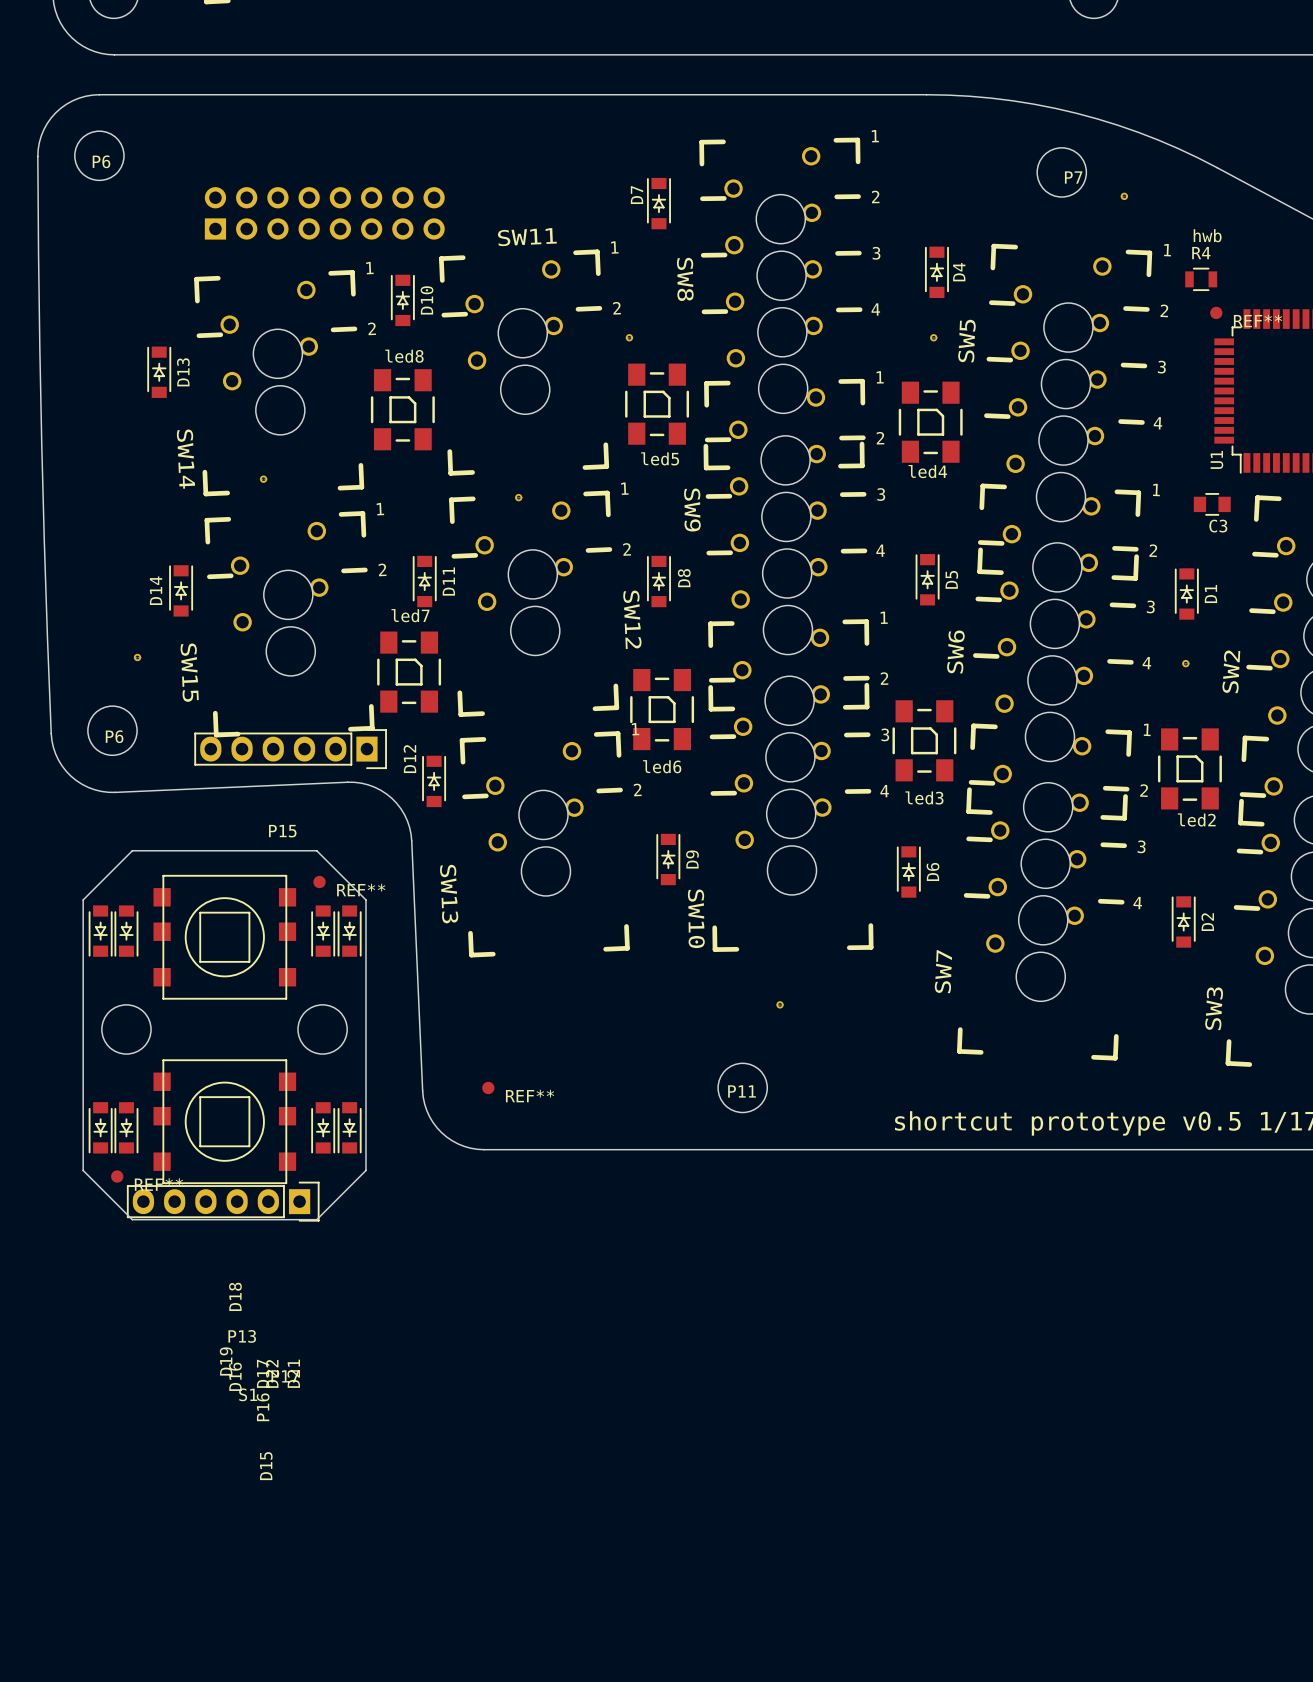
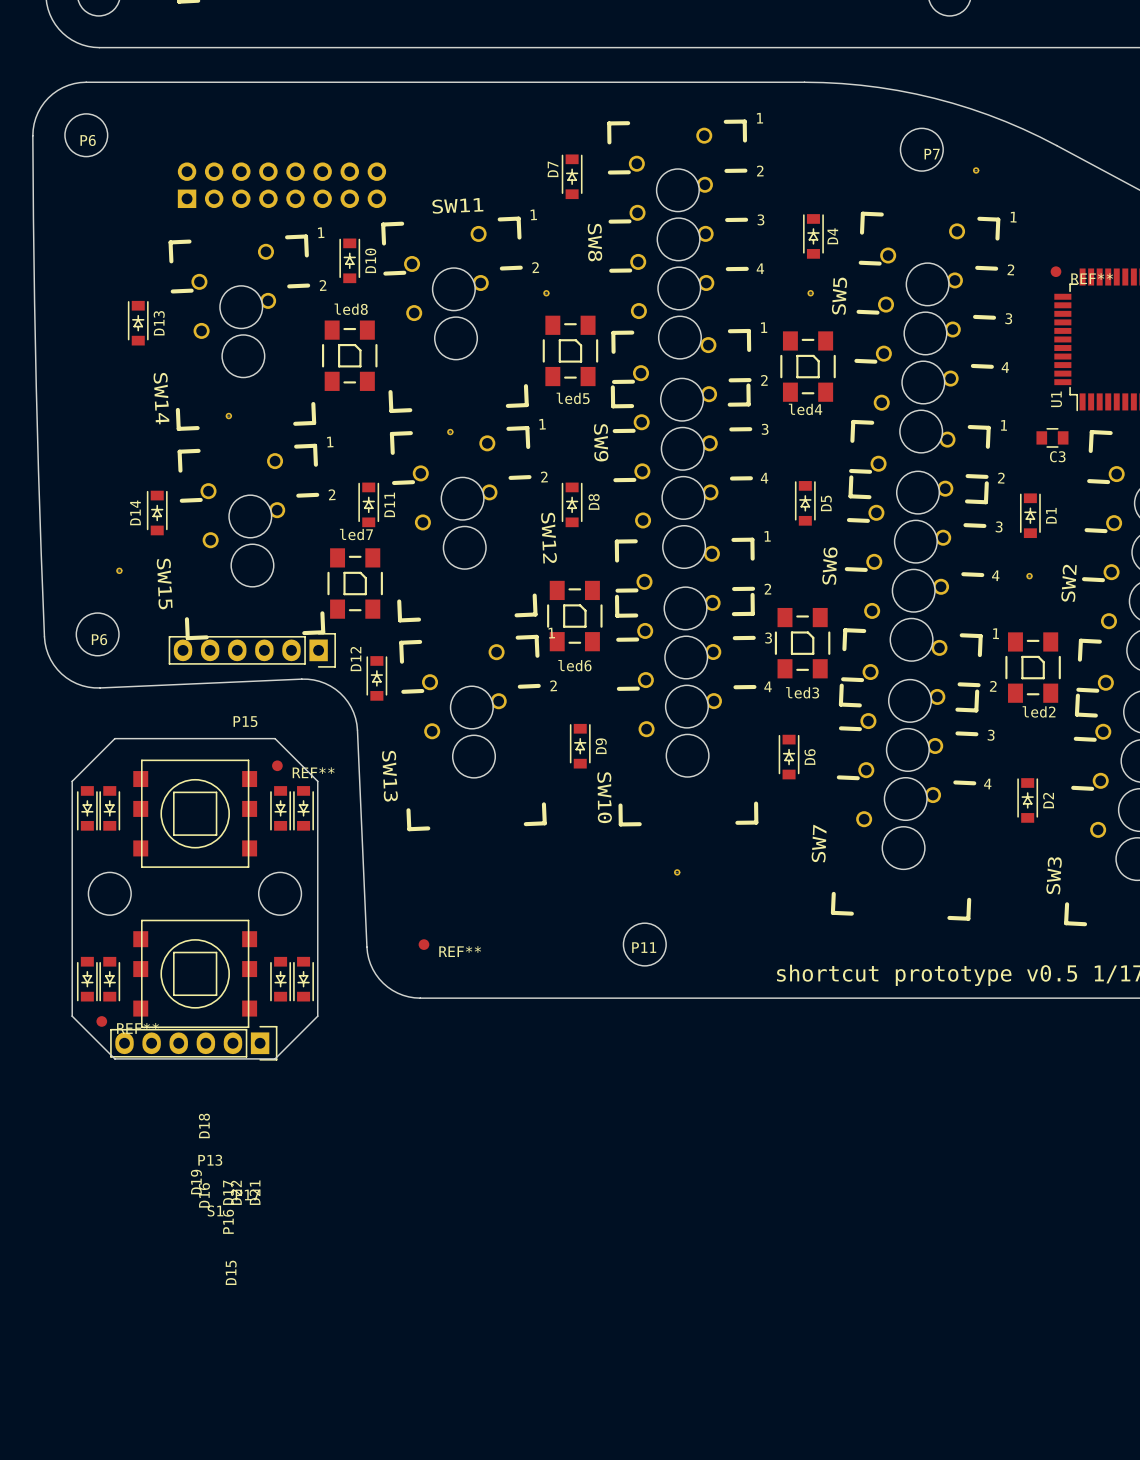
text: hwb (1207, 235) -> none
R4: (1201, 279) -> none

